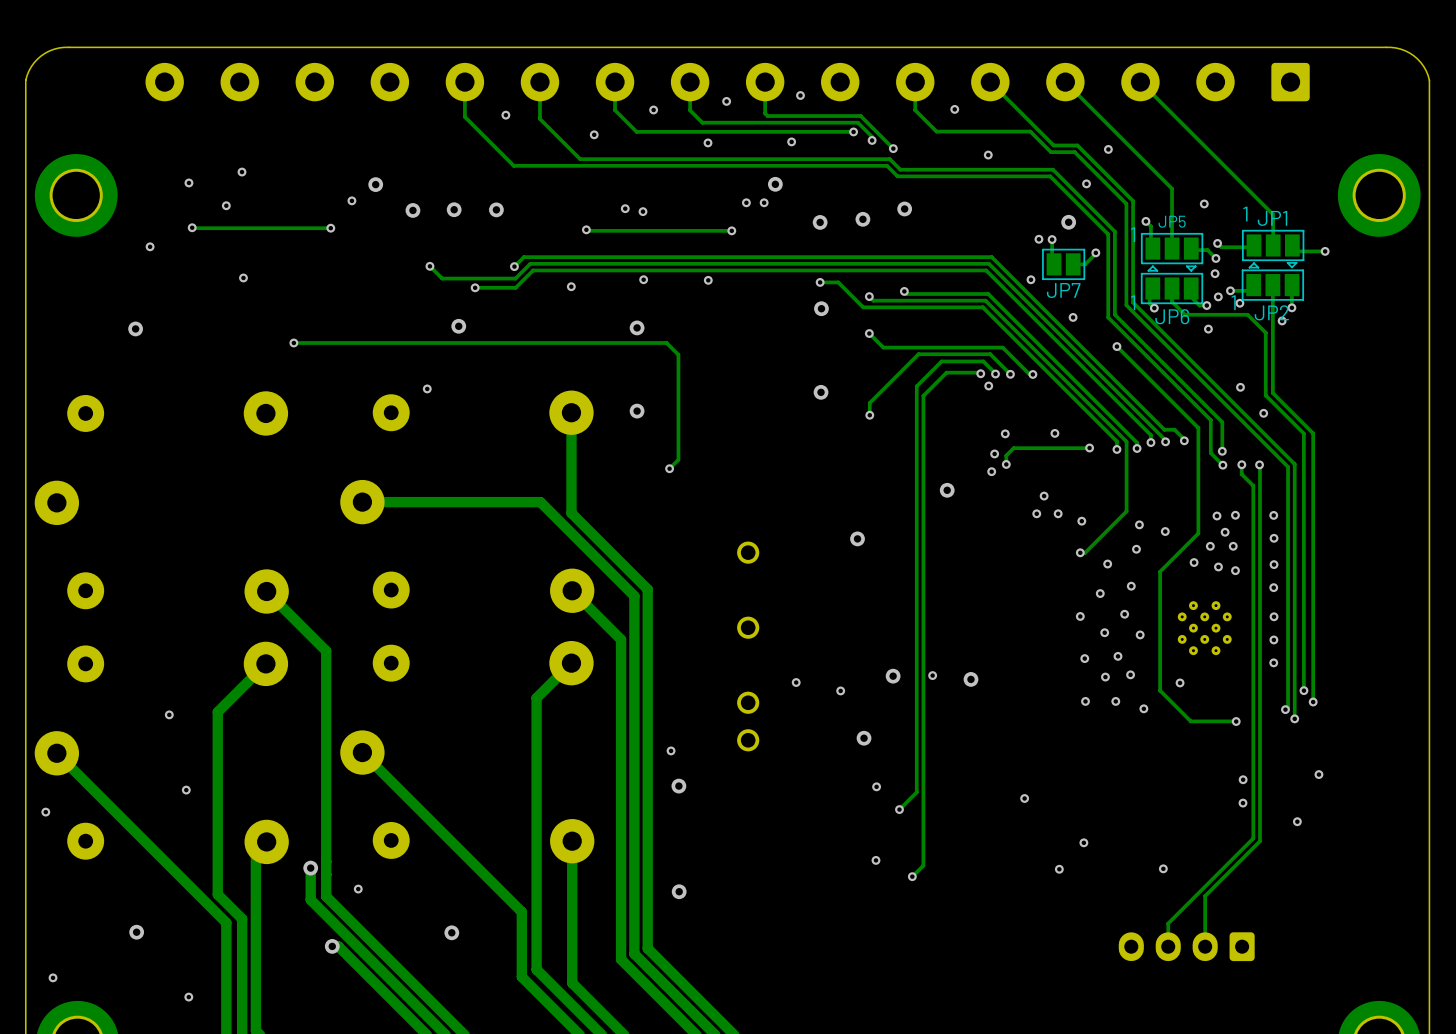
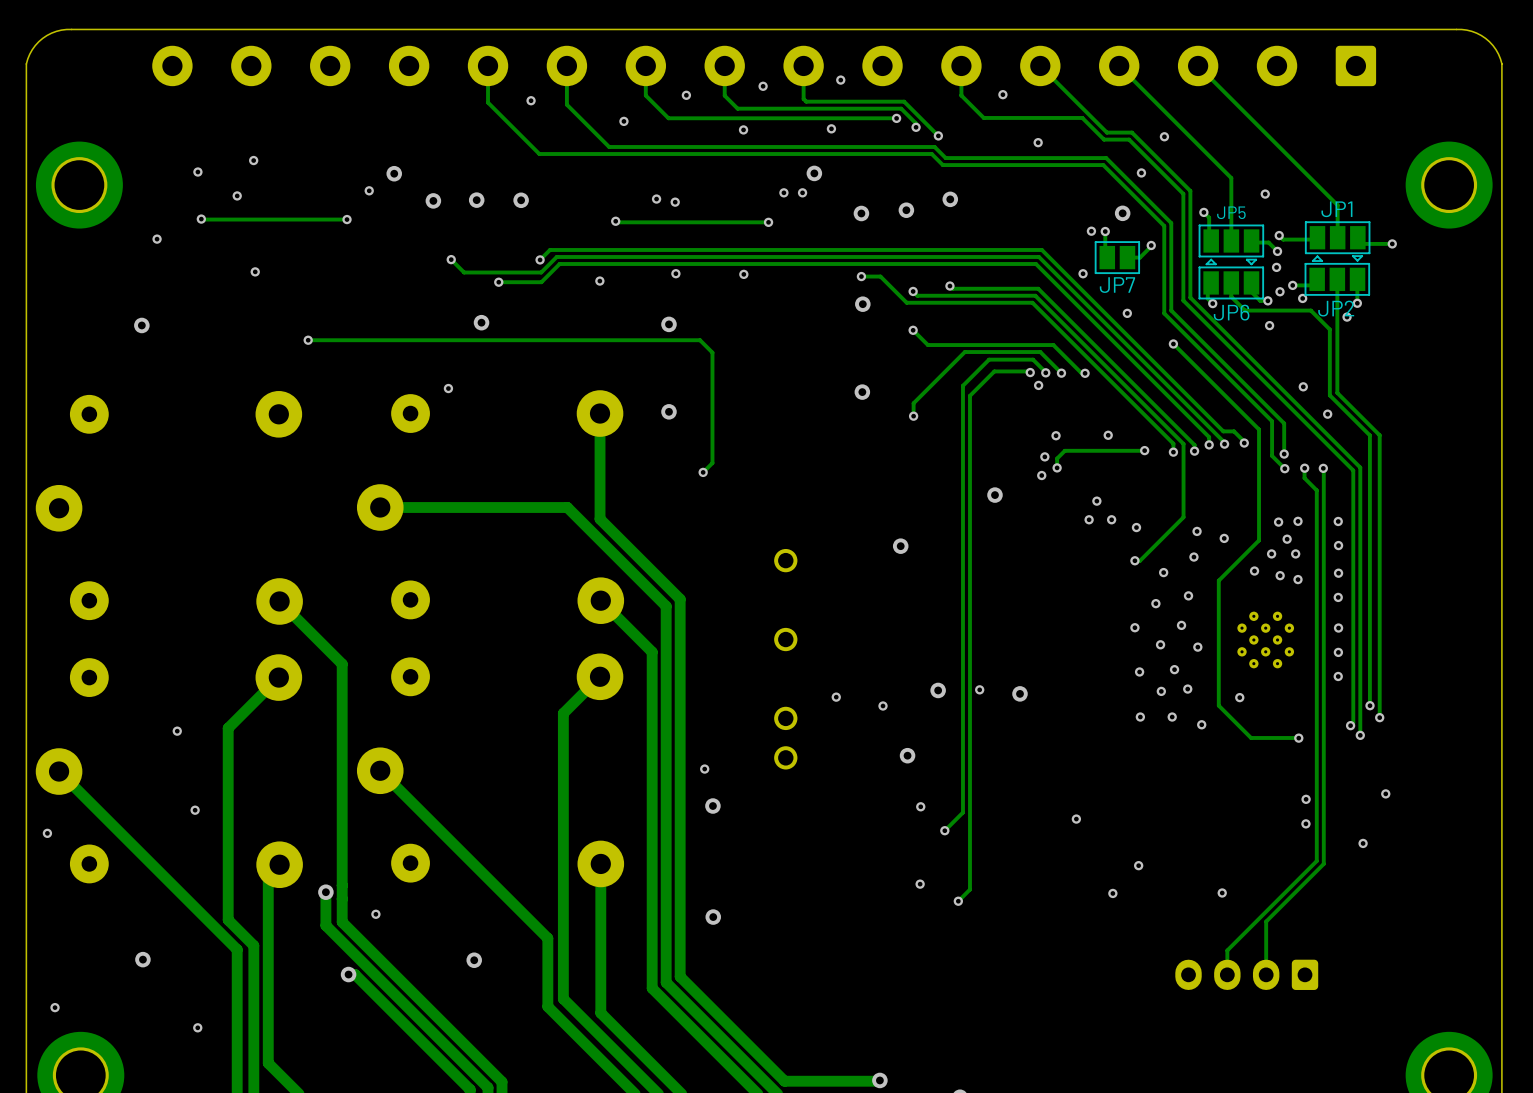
text: 1 (1245, 214) -> none
text: 1 (1133, 234) -> none
text: 1 (1133, 302) -> none
text: 1 (1233, 302) -> none

